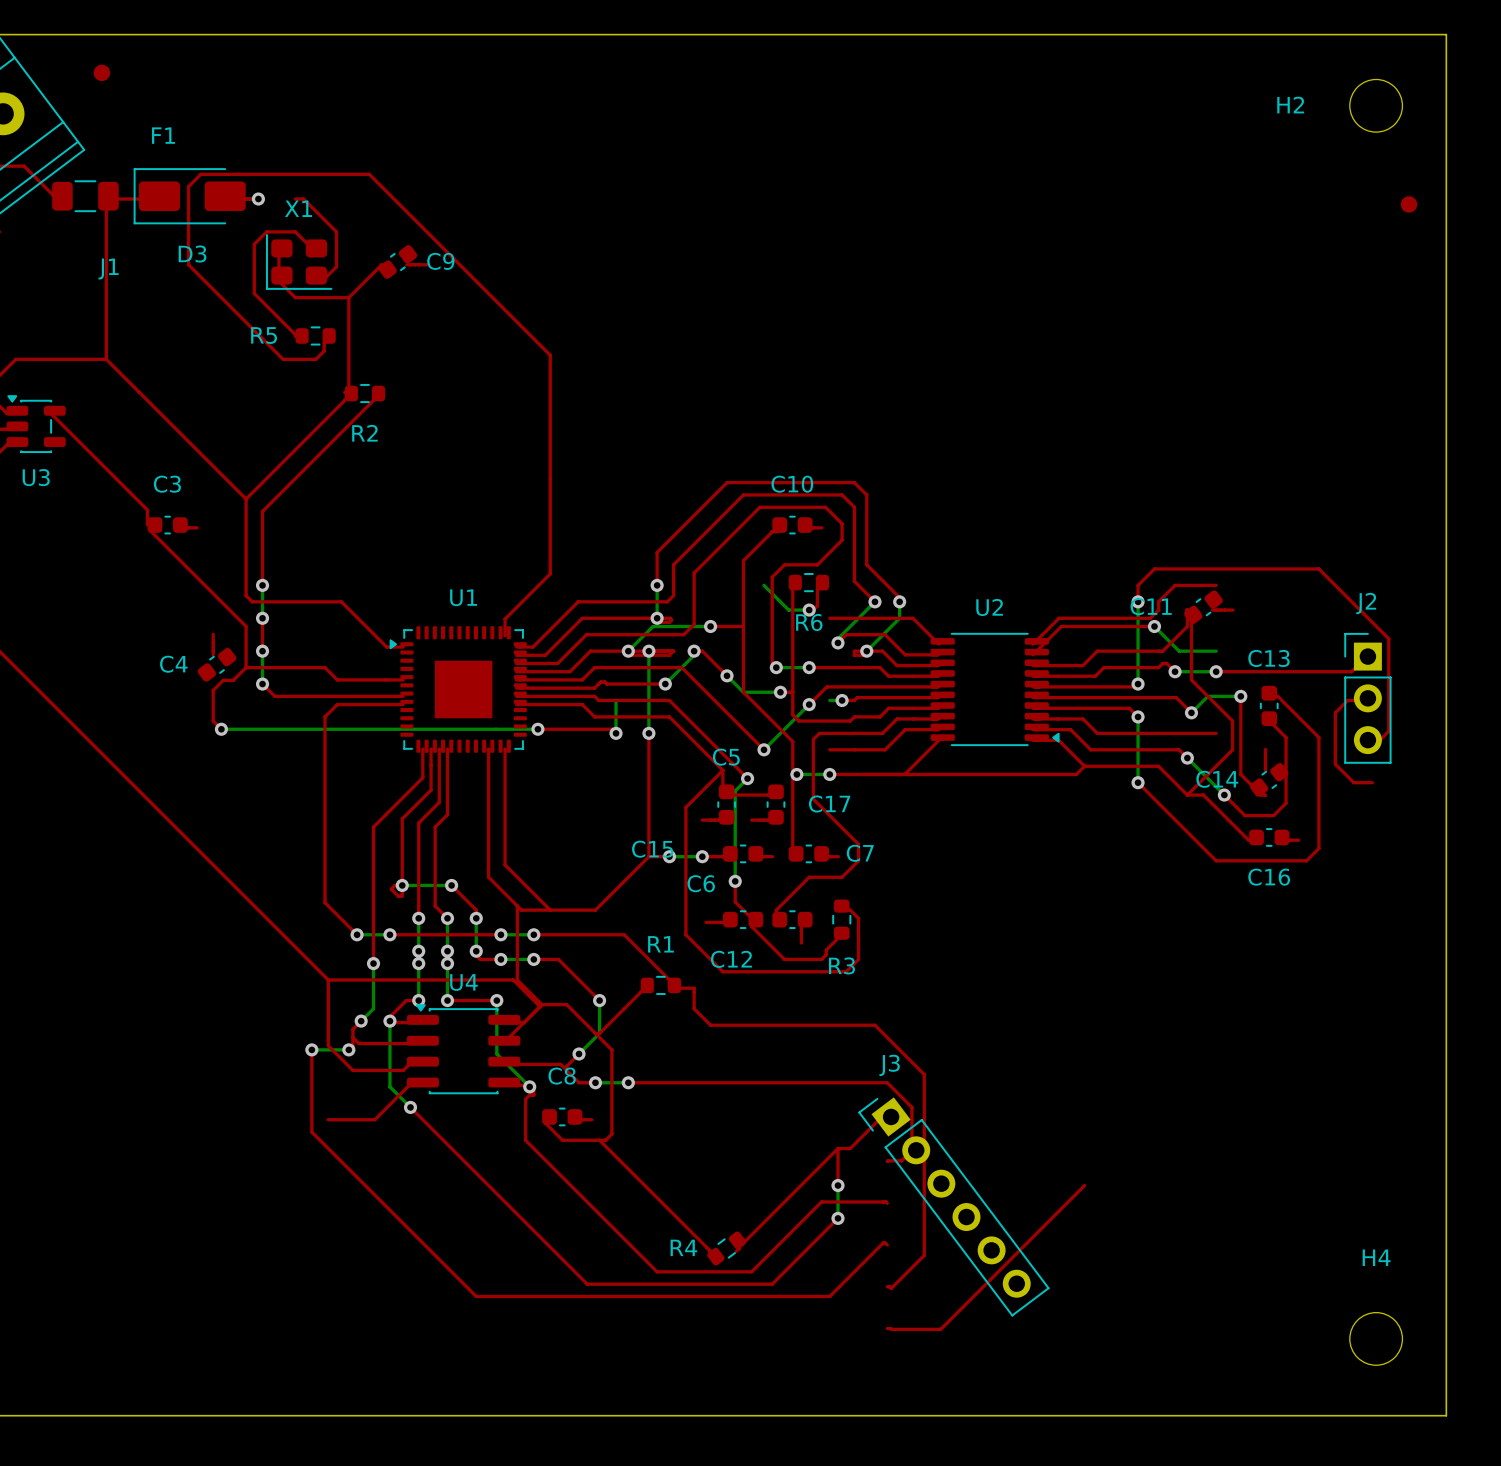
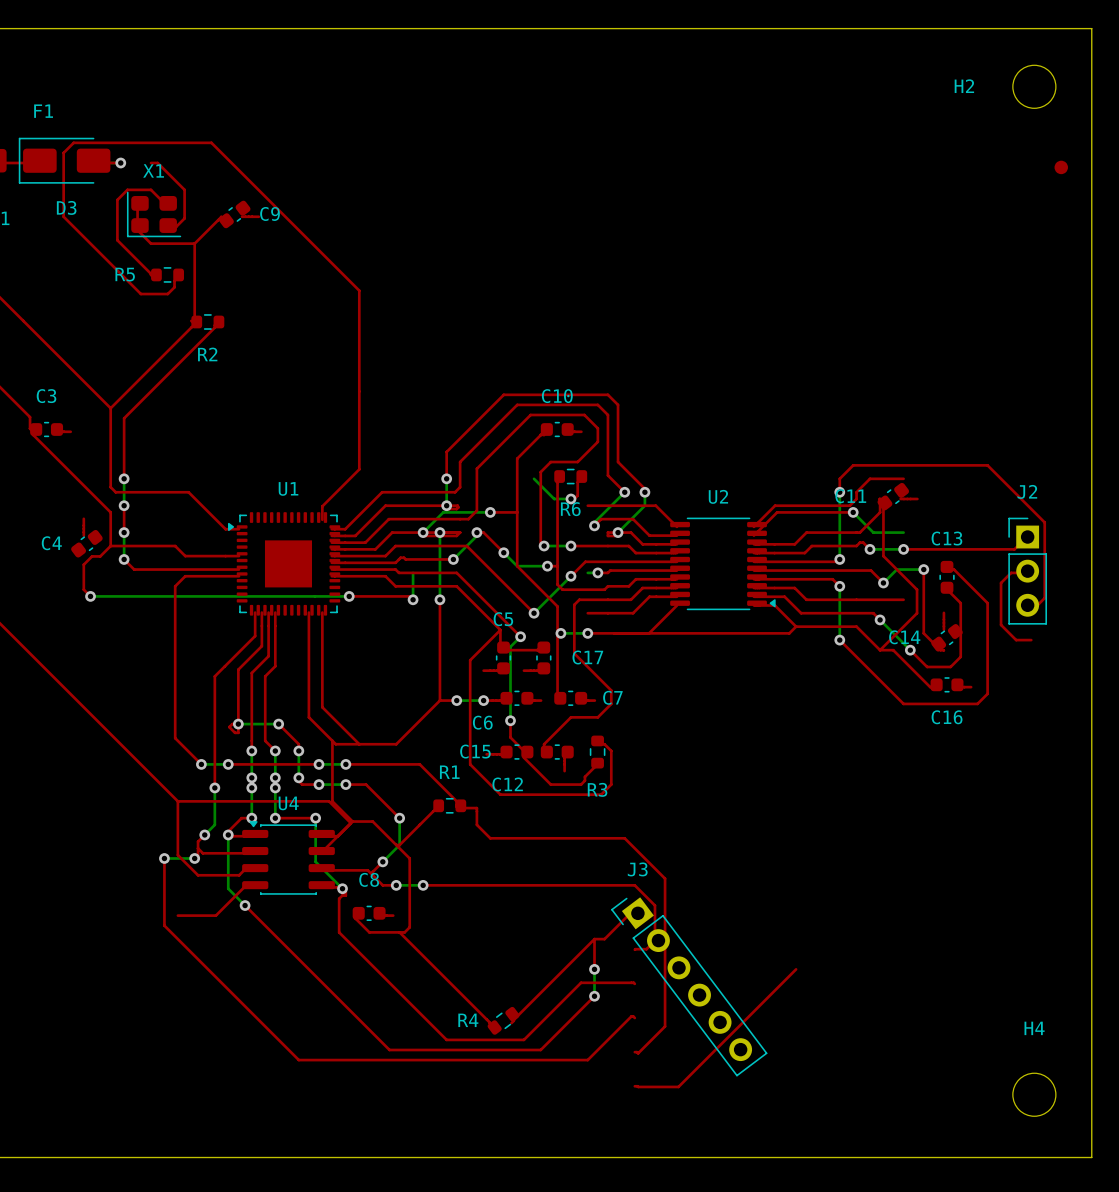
C15 name position: C15 (652, 849) -> C15 (475, 751)

